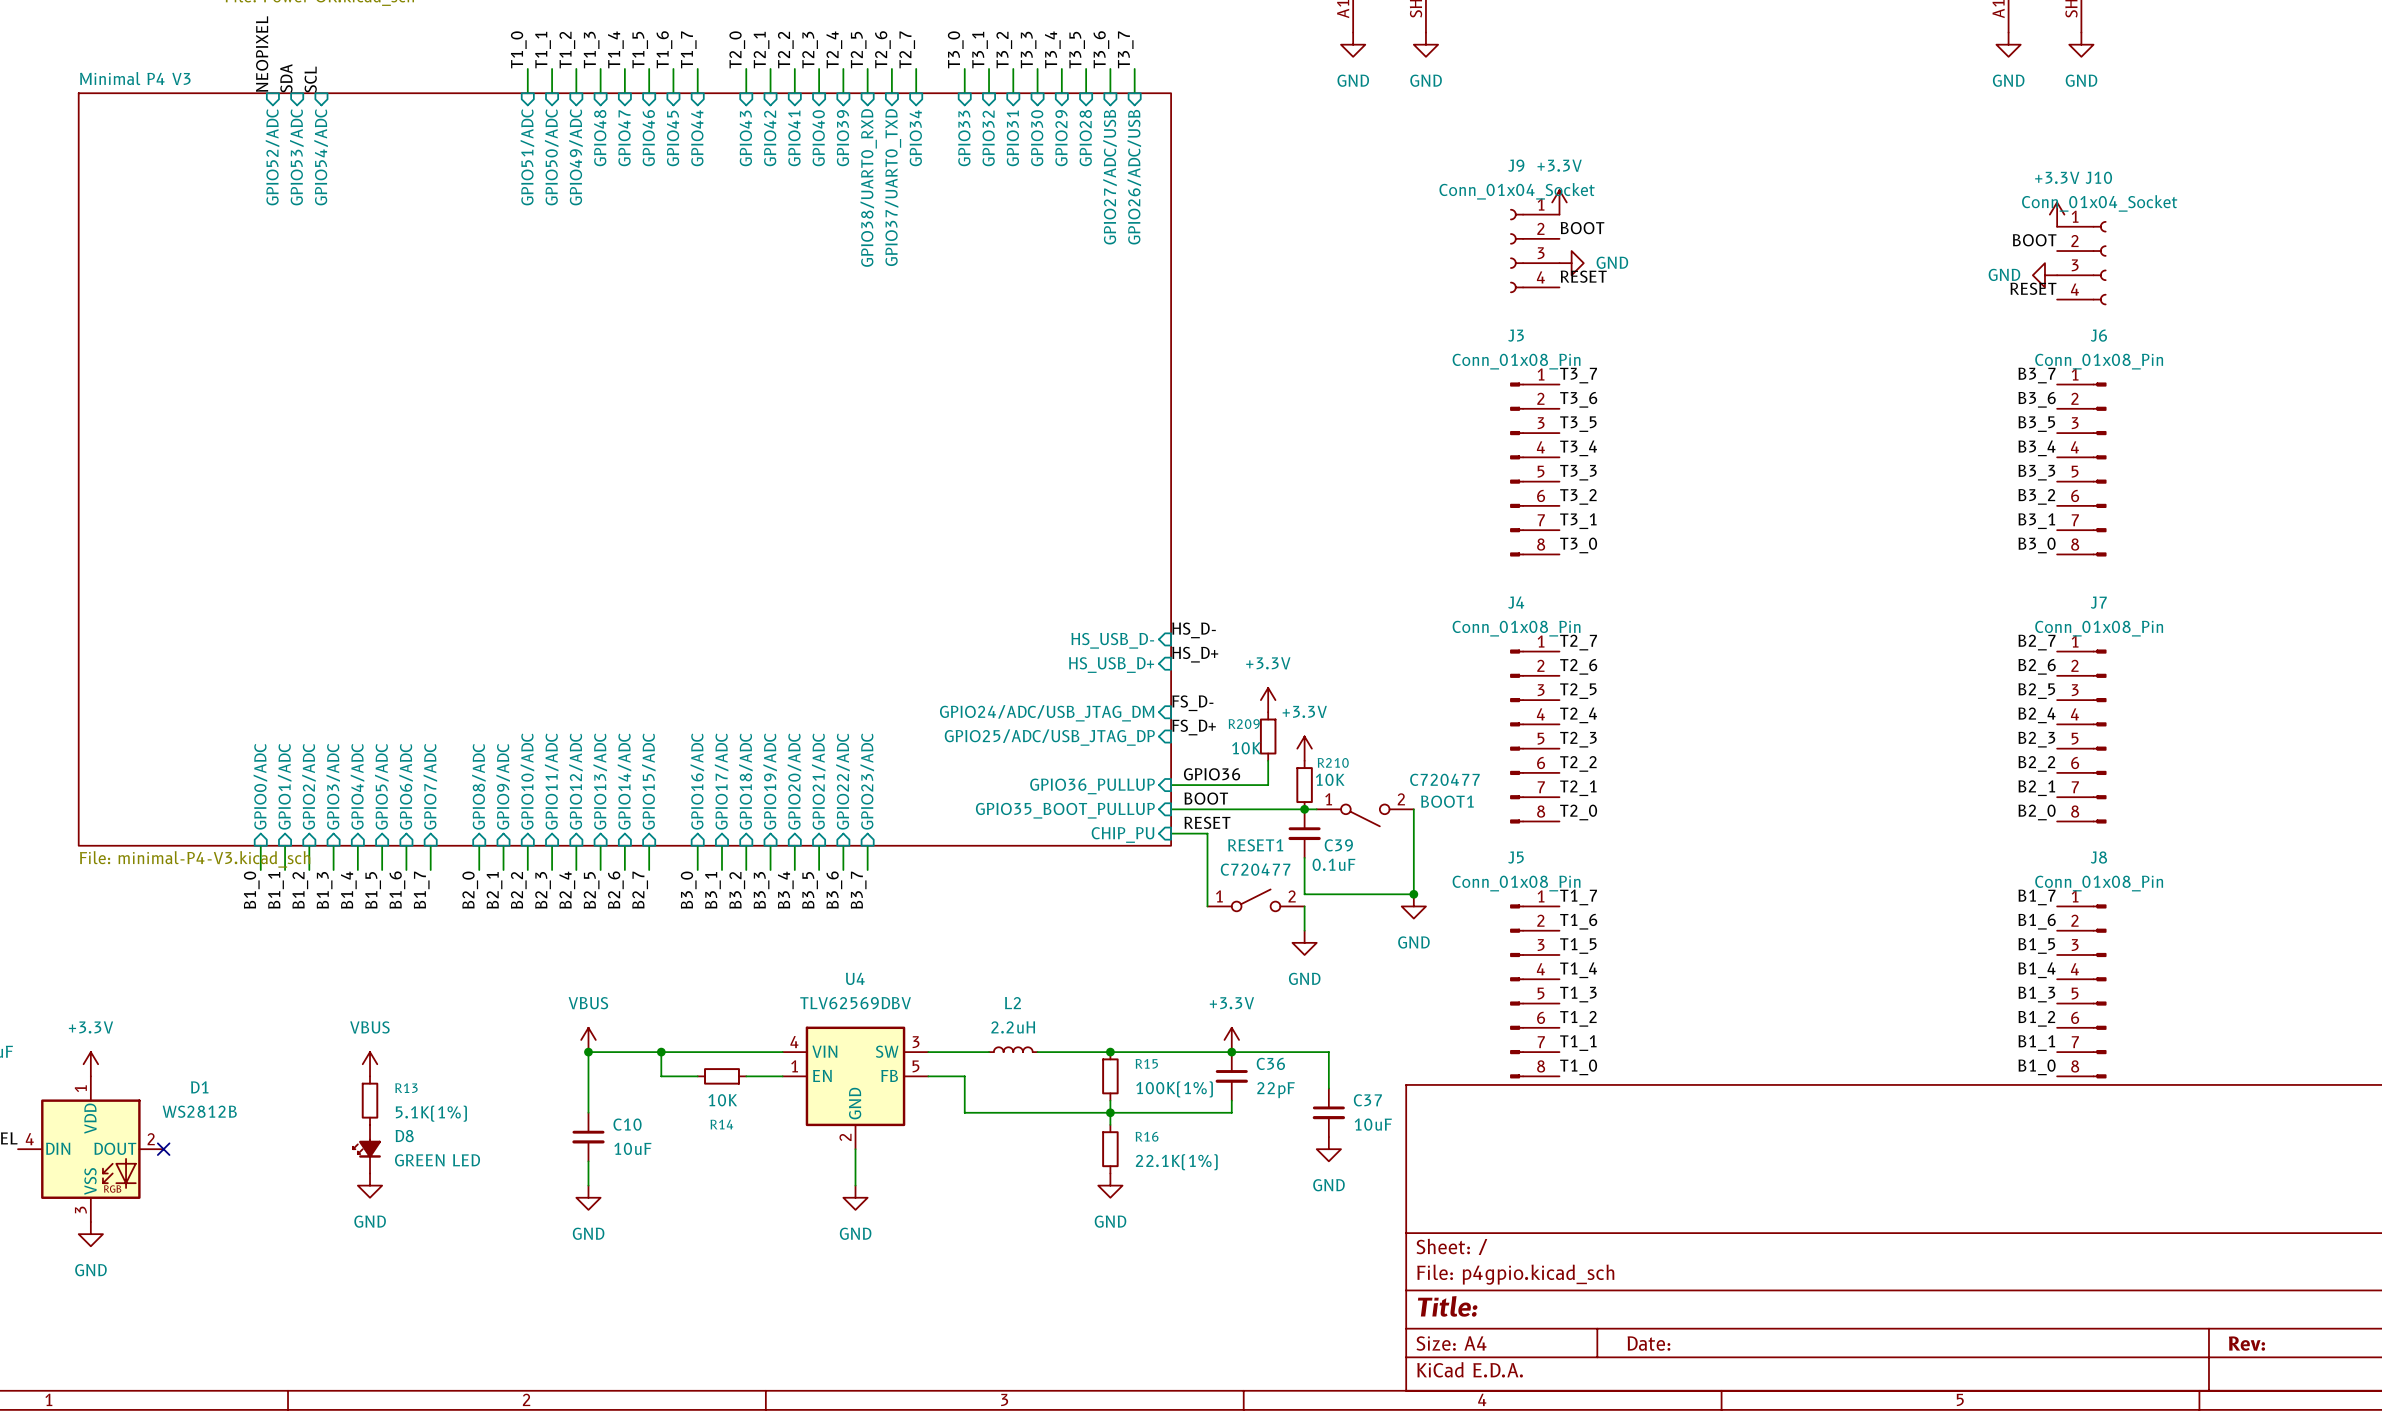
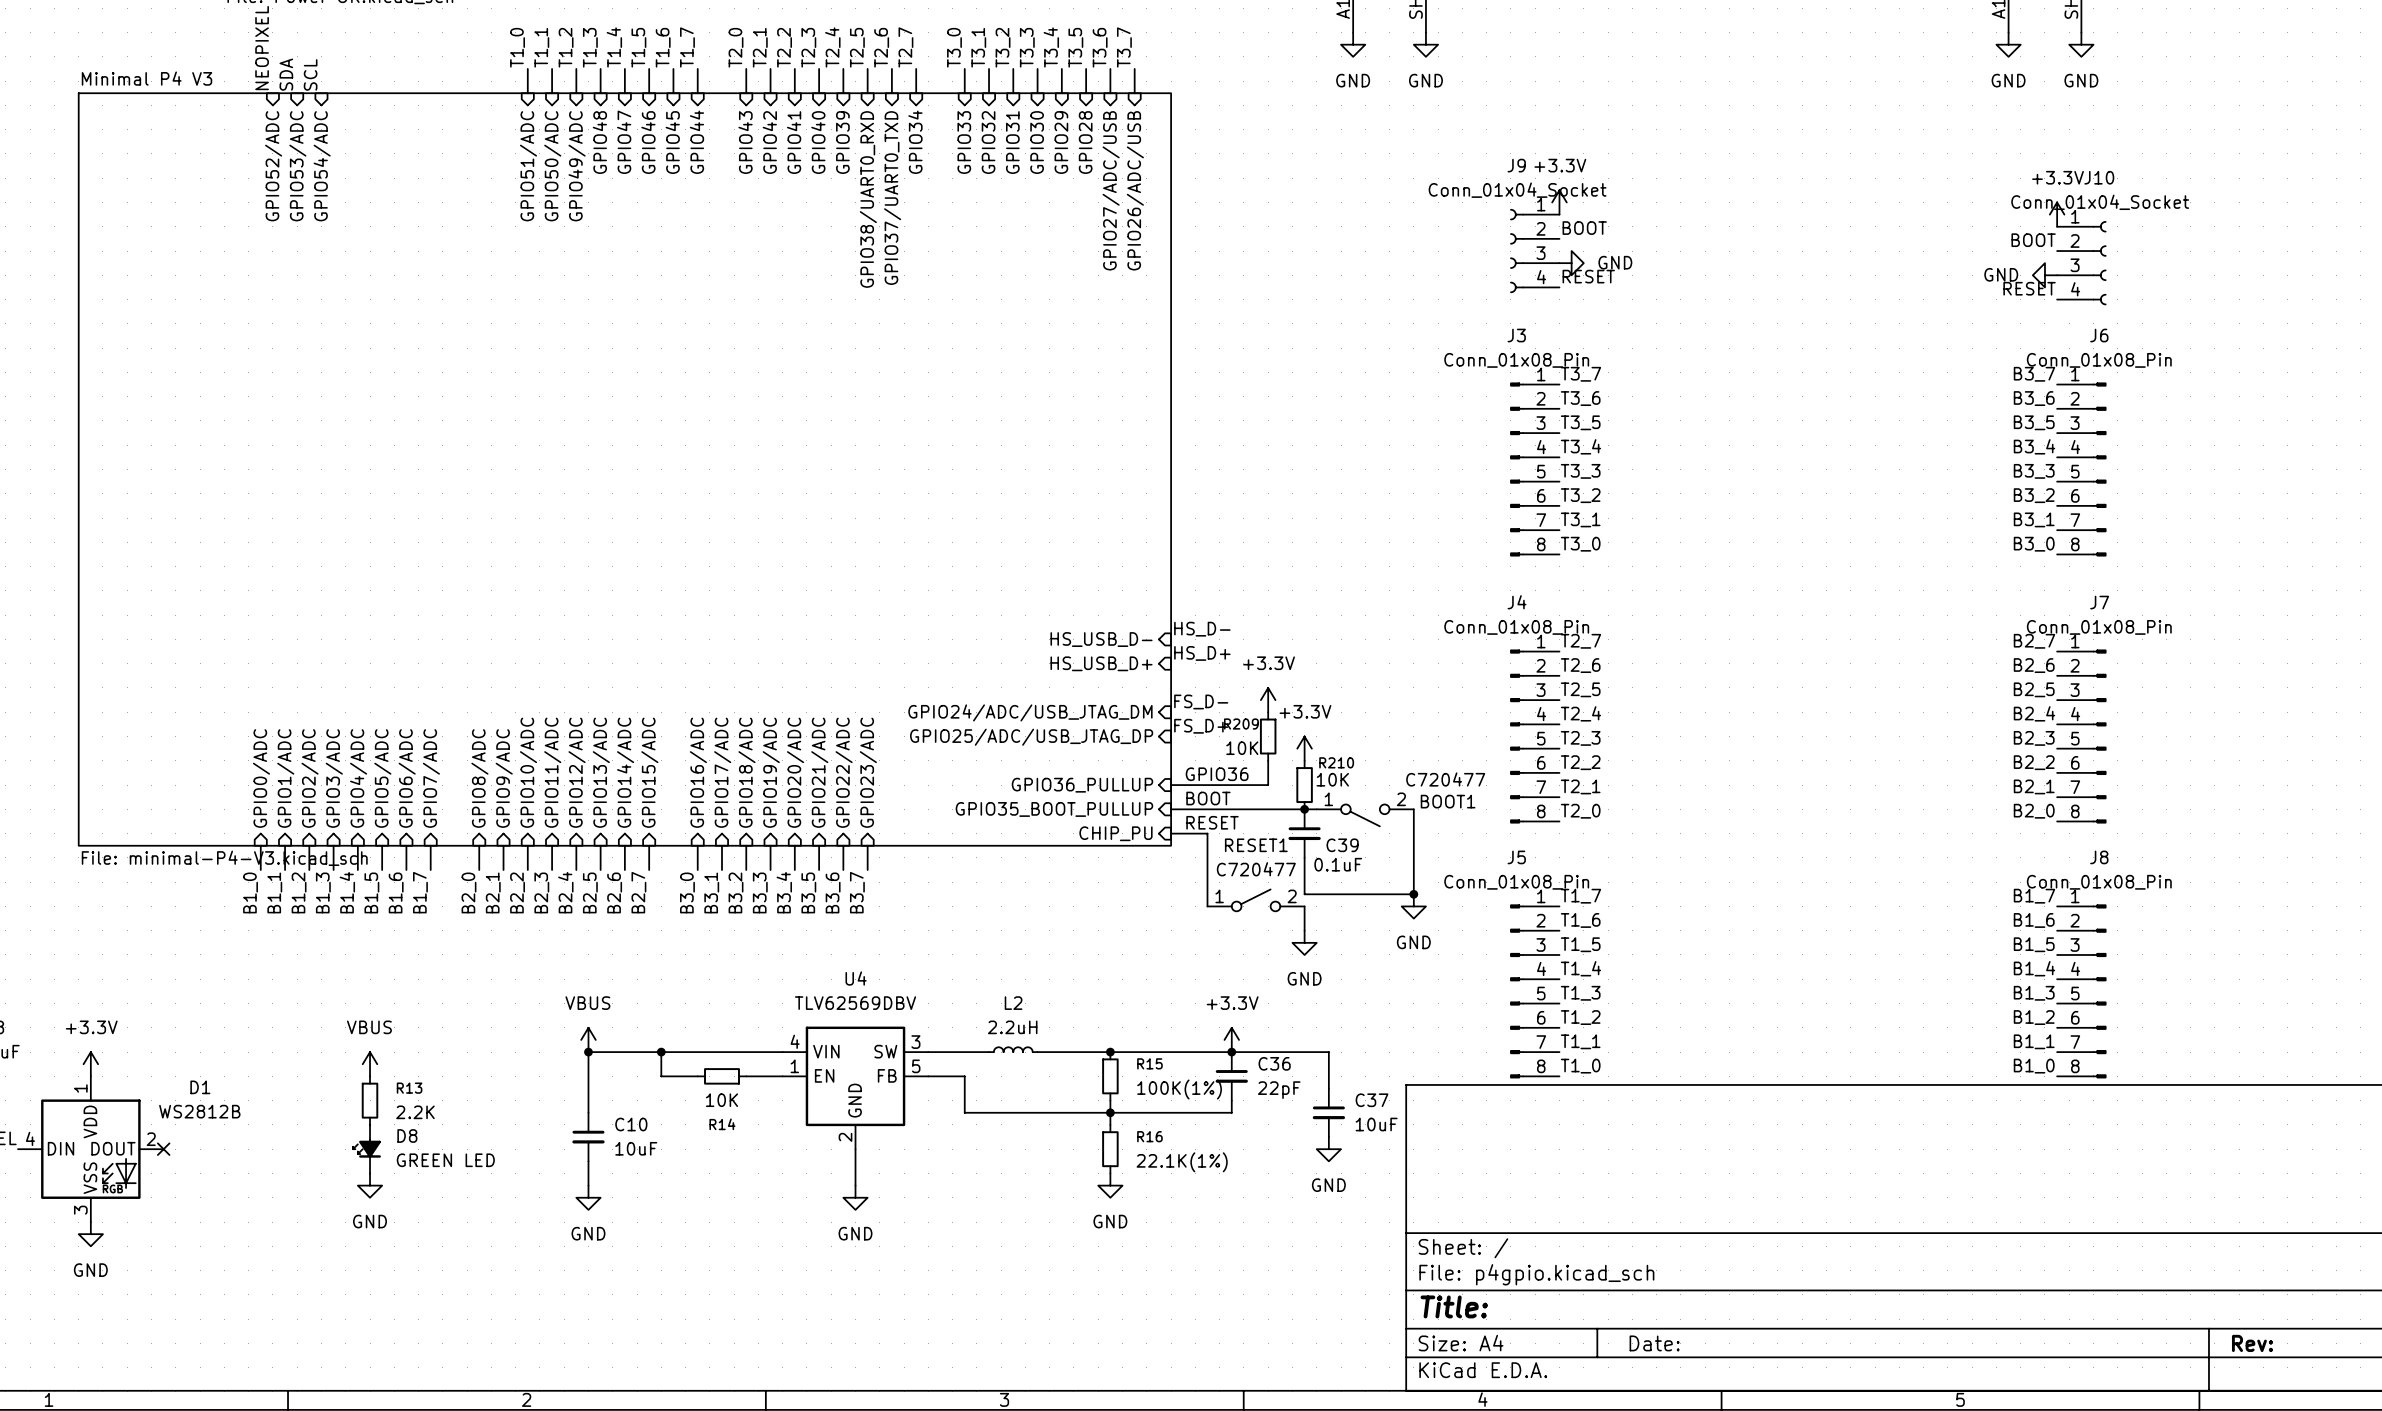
R13 value: 5.1K(1%) (431, 1113) -> 2.2K (415, 1112)

